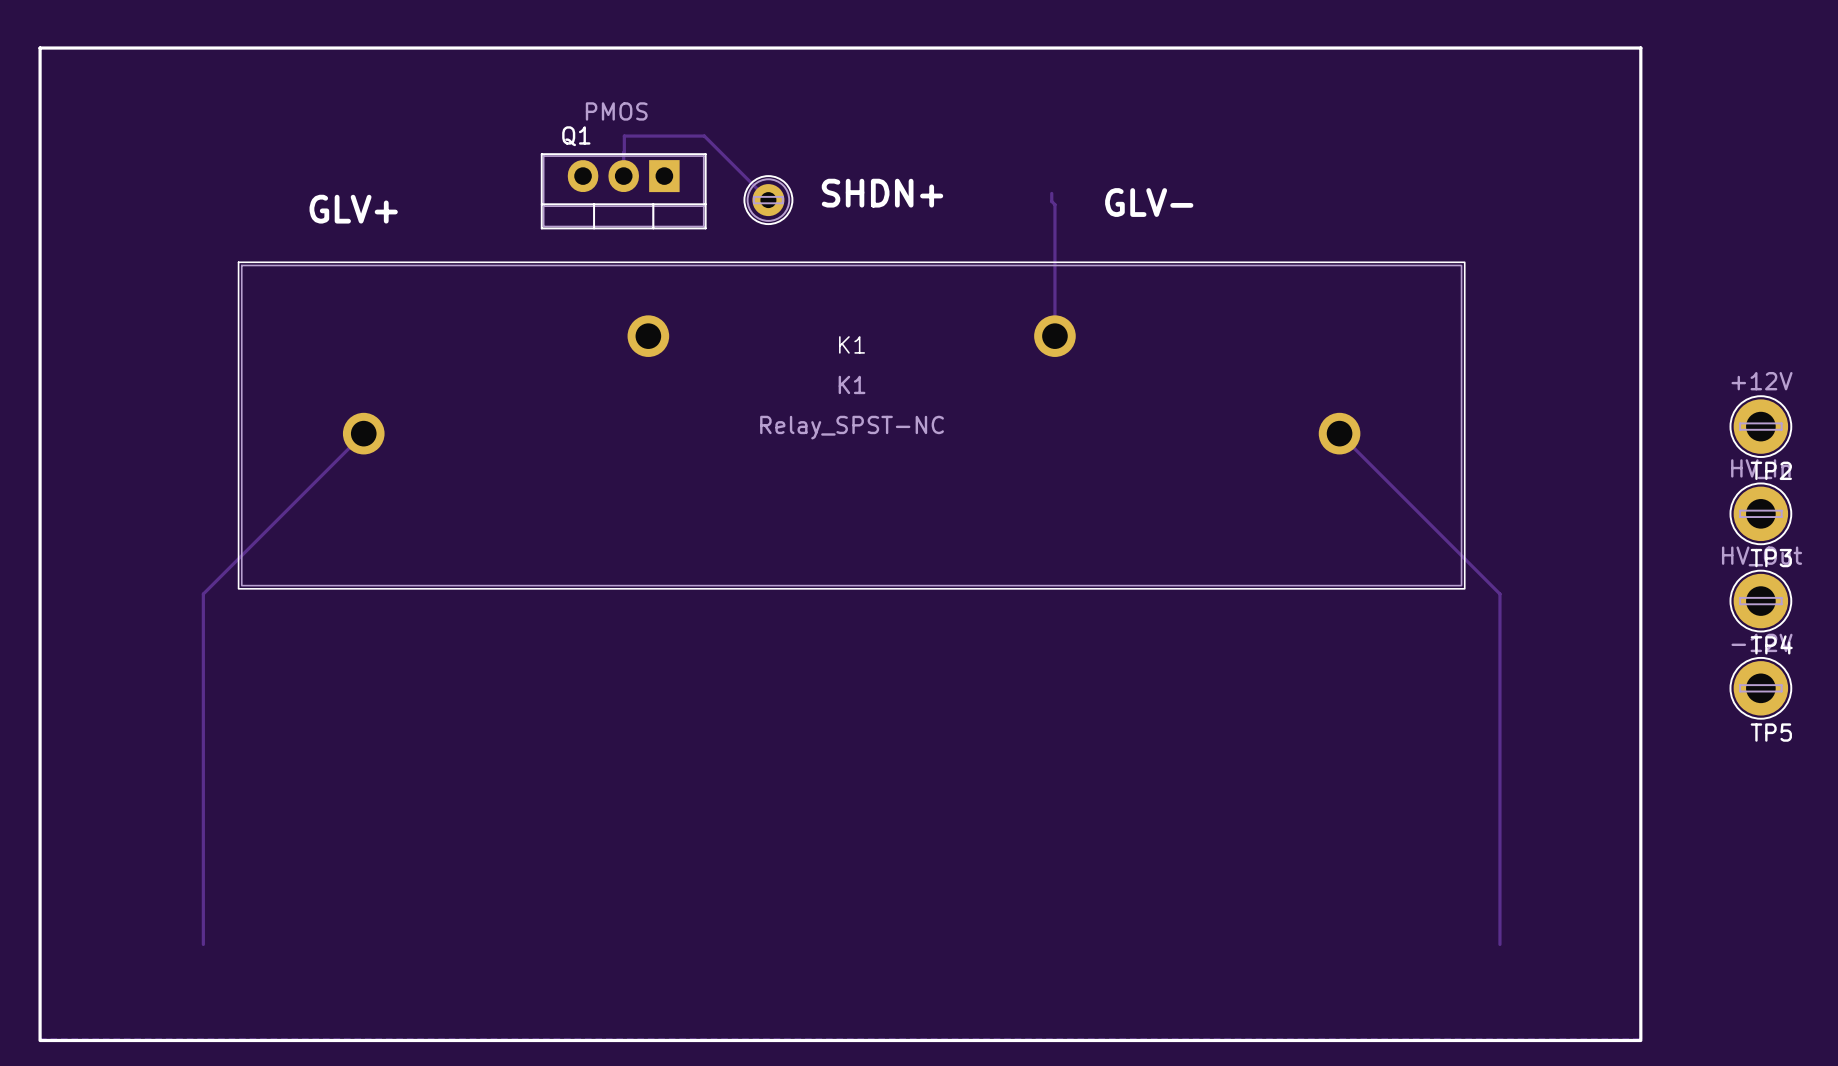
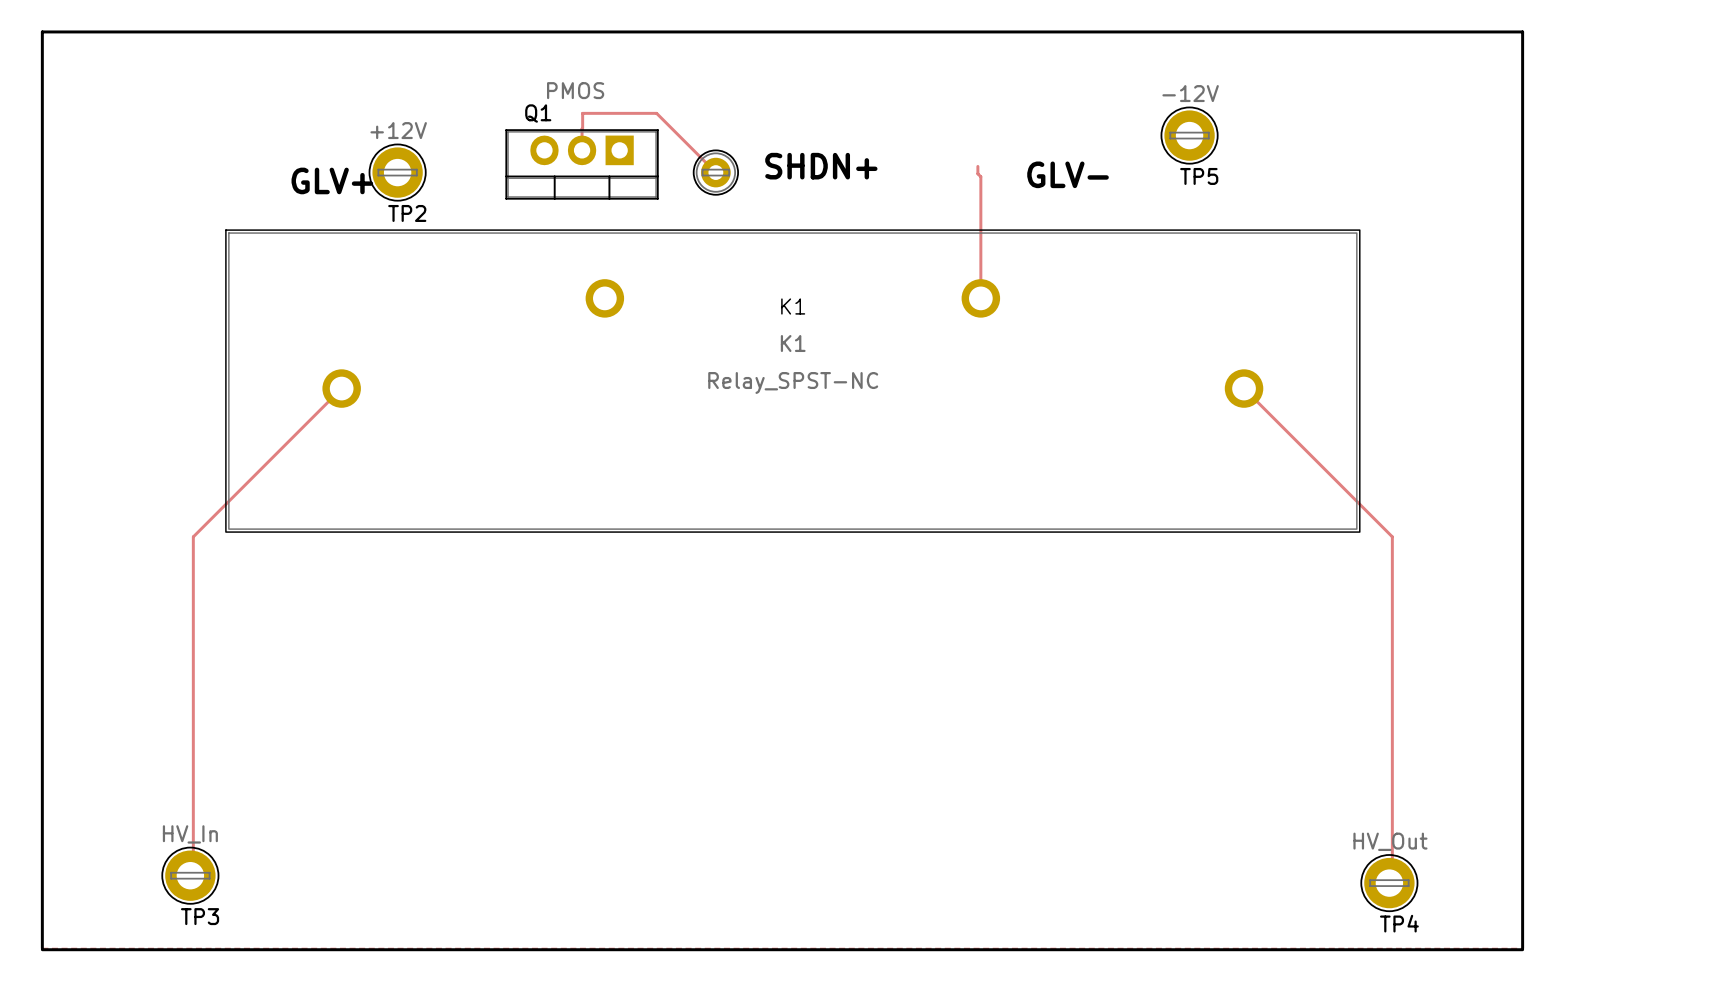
TP2 position: (1760, 426) -> (397, 172)
TP3 position: (1760, 513) -> (190, 875)
TP4 position: (1760, 601) -> (1389, 883)
TP5 position: (1760, 688) -> (1189, 135)

